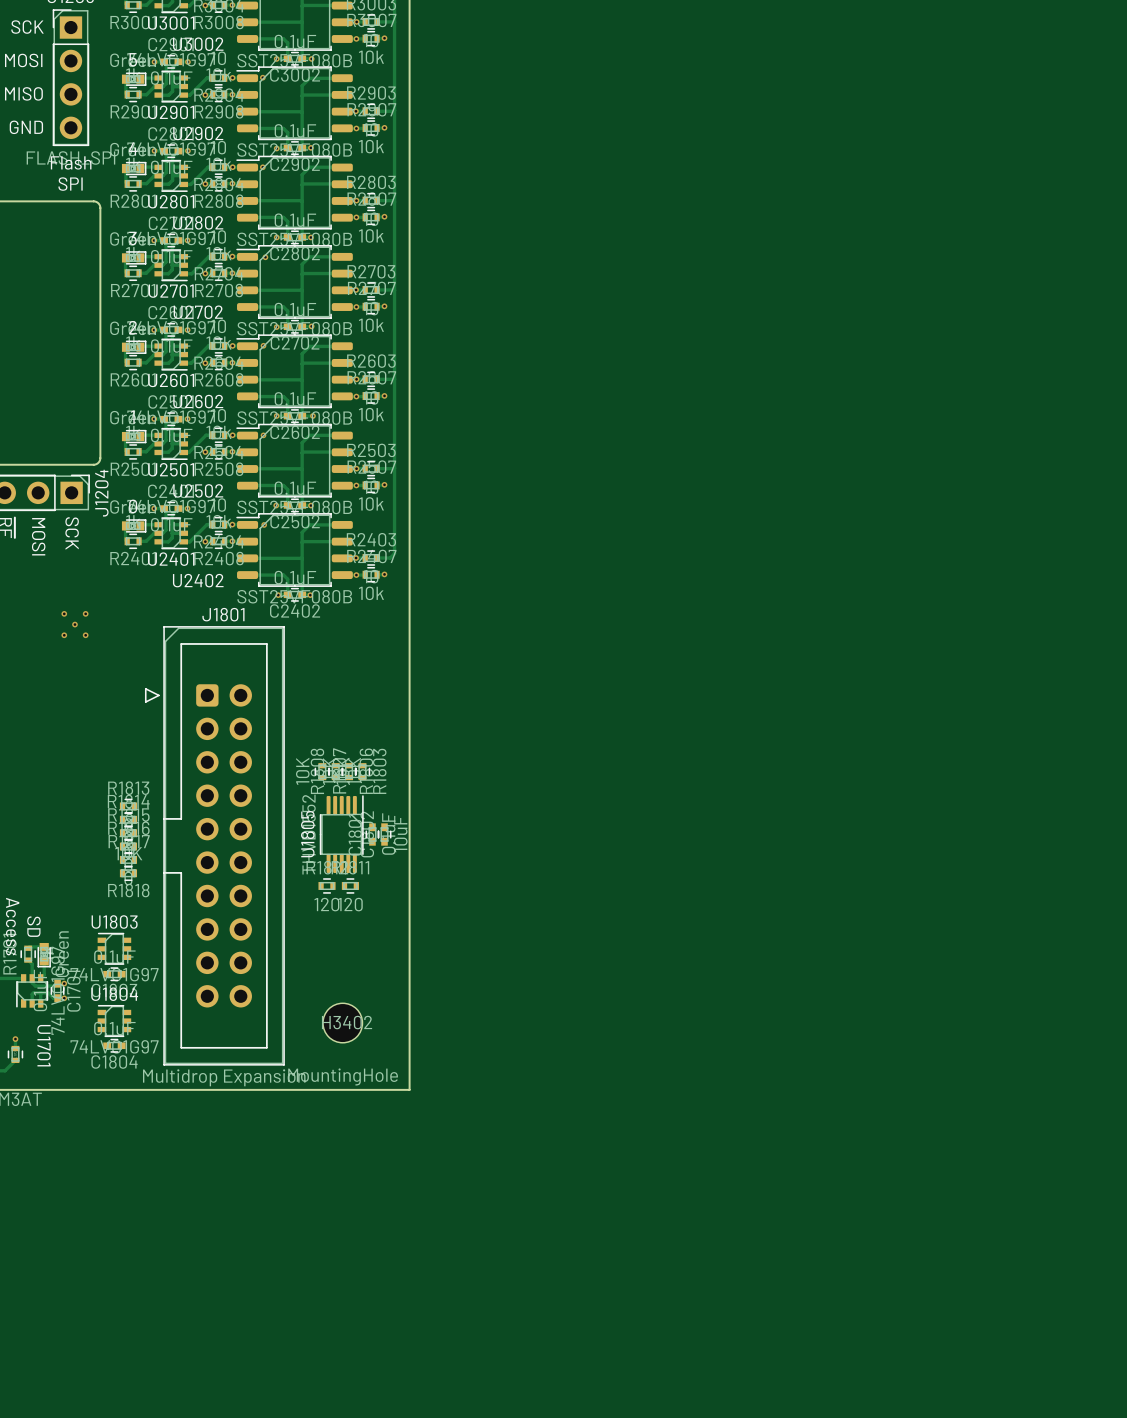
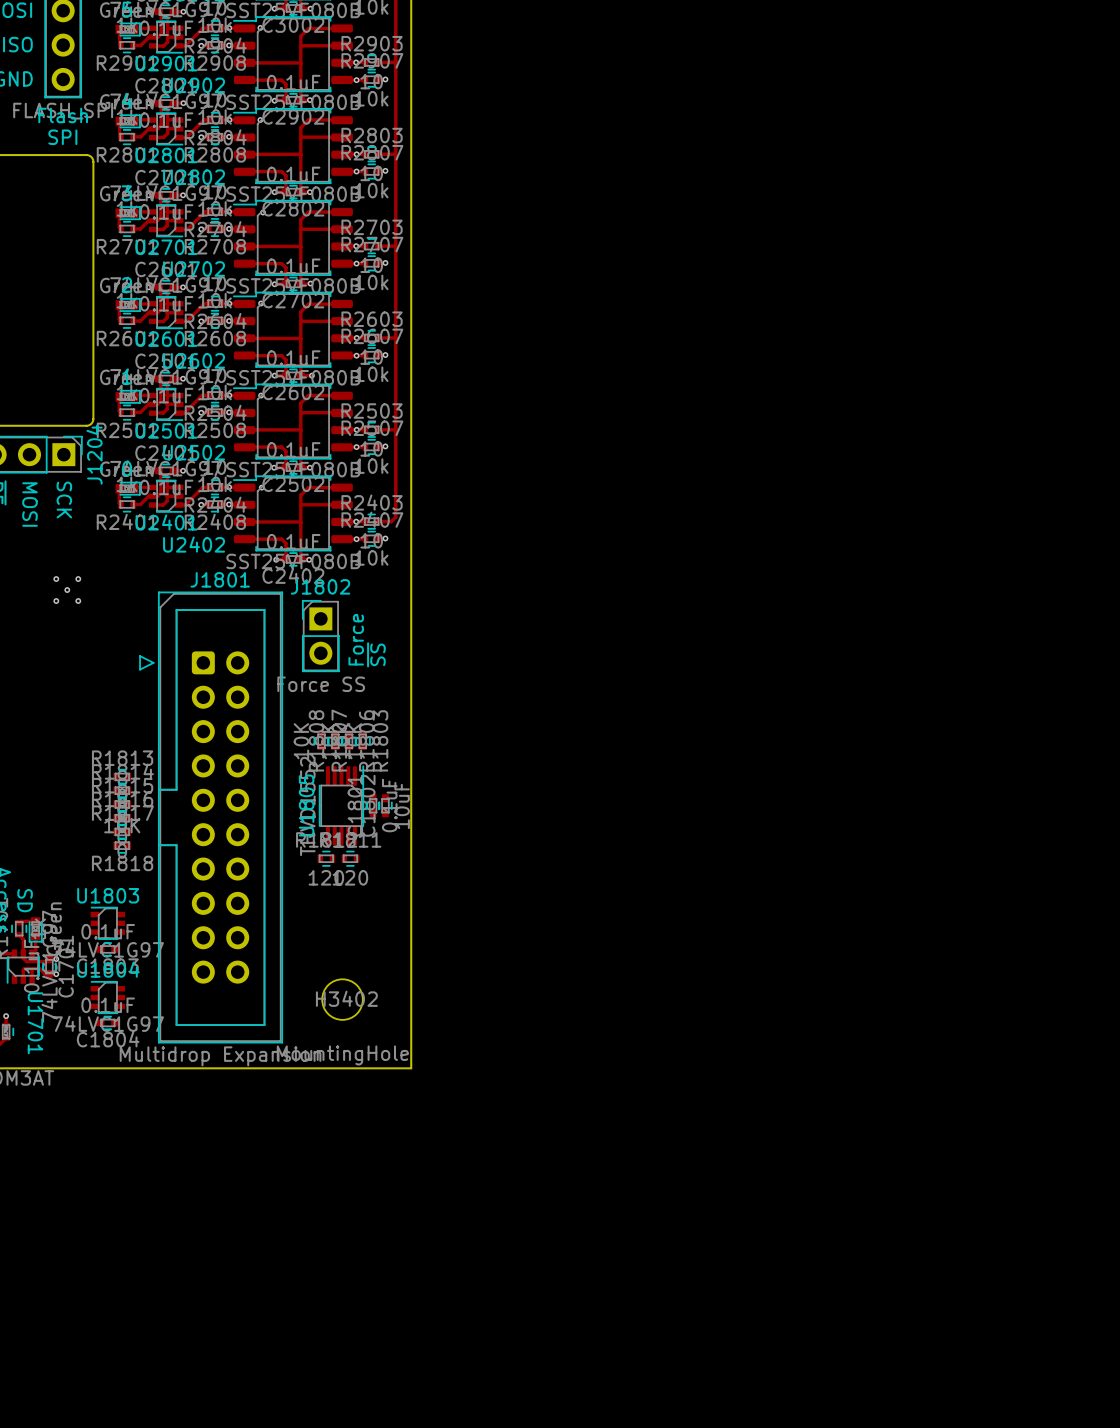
J1802: none -> Force SS (320, 636)
text: none -> Force (356, 639)
text: none -> ~{SS} (376, 654)

